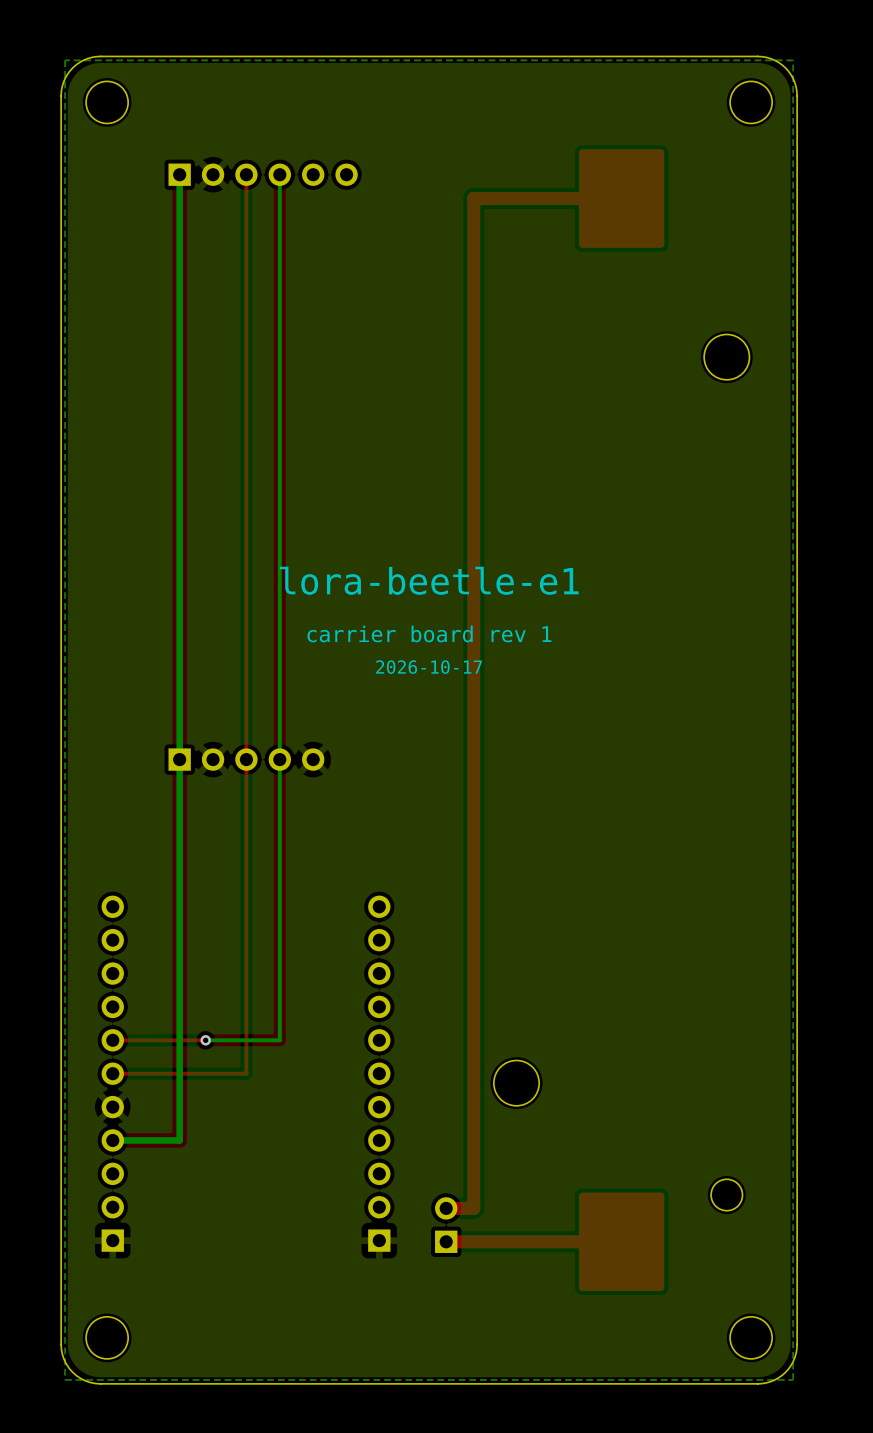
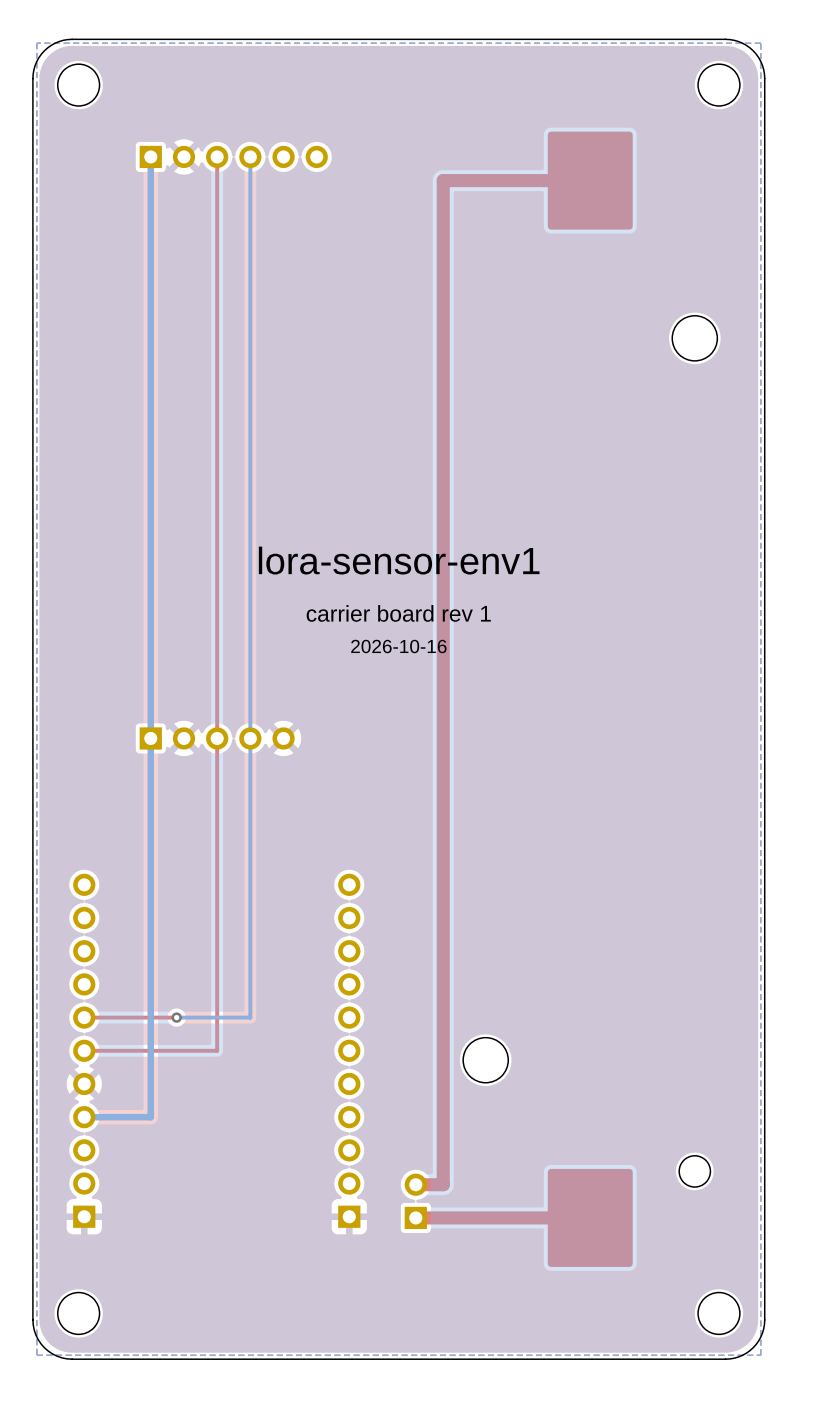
text: lora-beetle-e1 (429, 580) -> lora-sensor-env1 (399, 560)
text: 2026-10-17 (429, 667) -> 2026-10-16 (398, 646)

